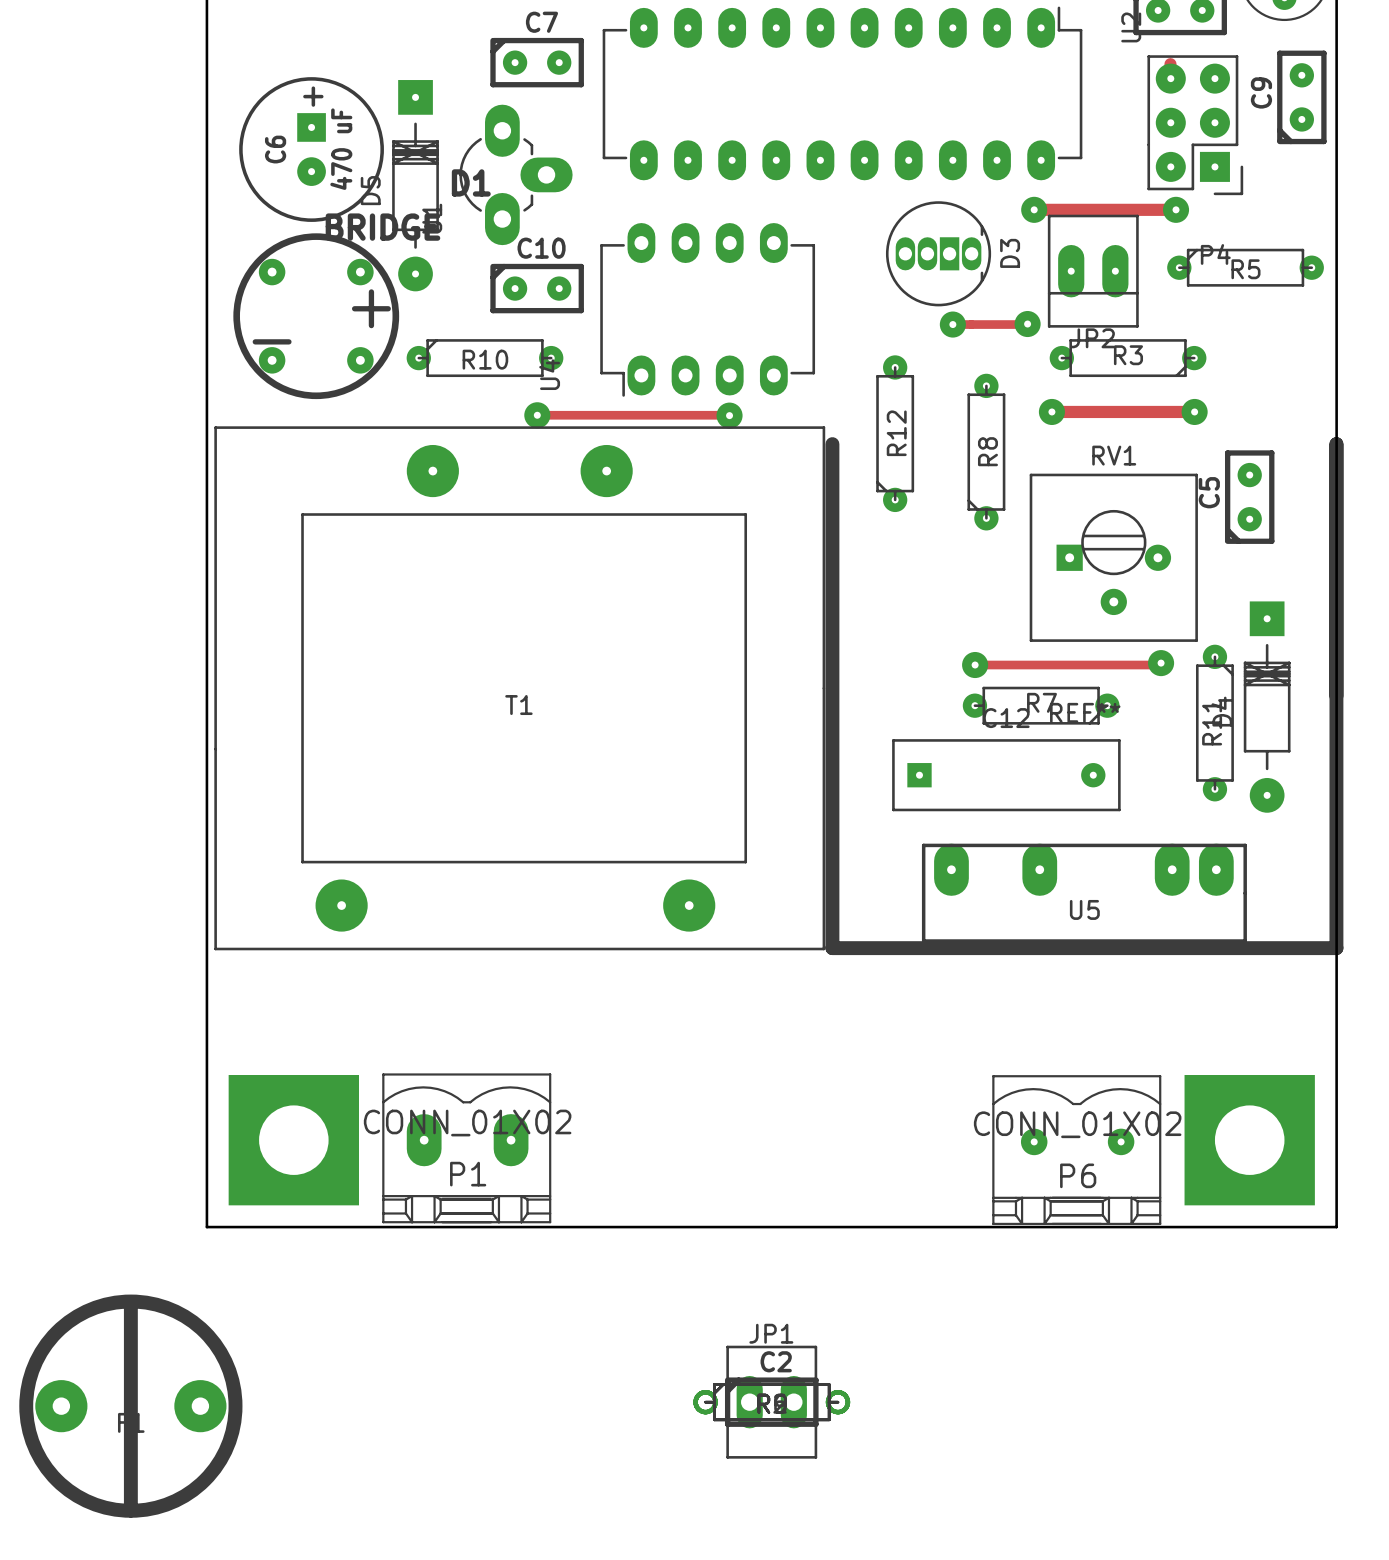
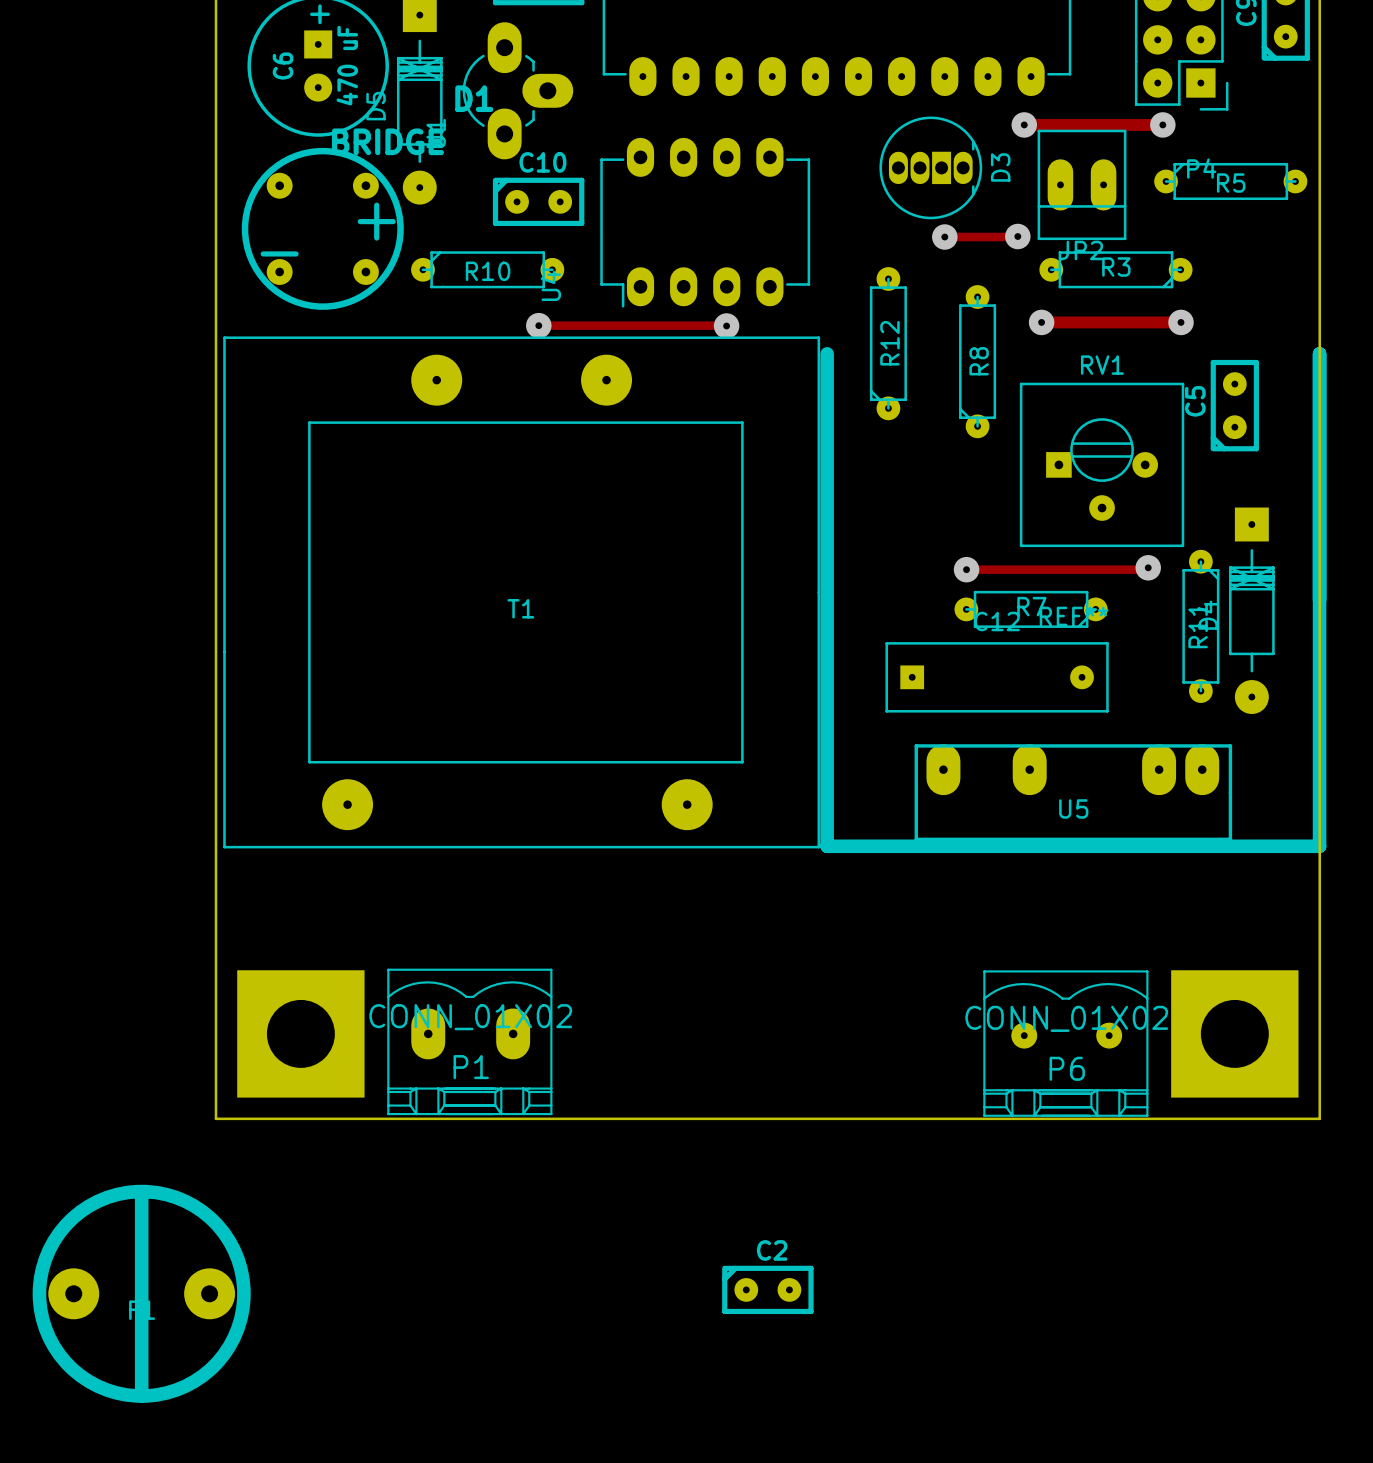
JP1: (771, 1402) -> none
part: (771, 1402) -> none
part: (771, 1402) -> none
part: (771, 1402) -> none

